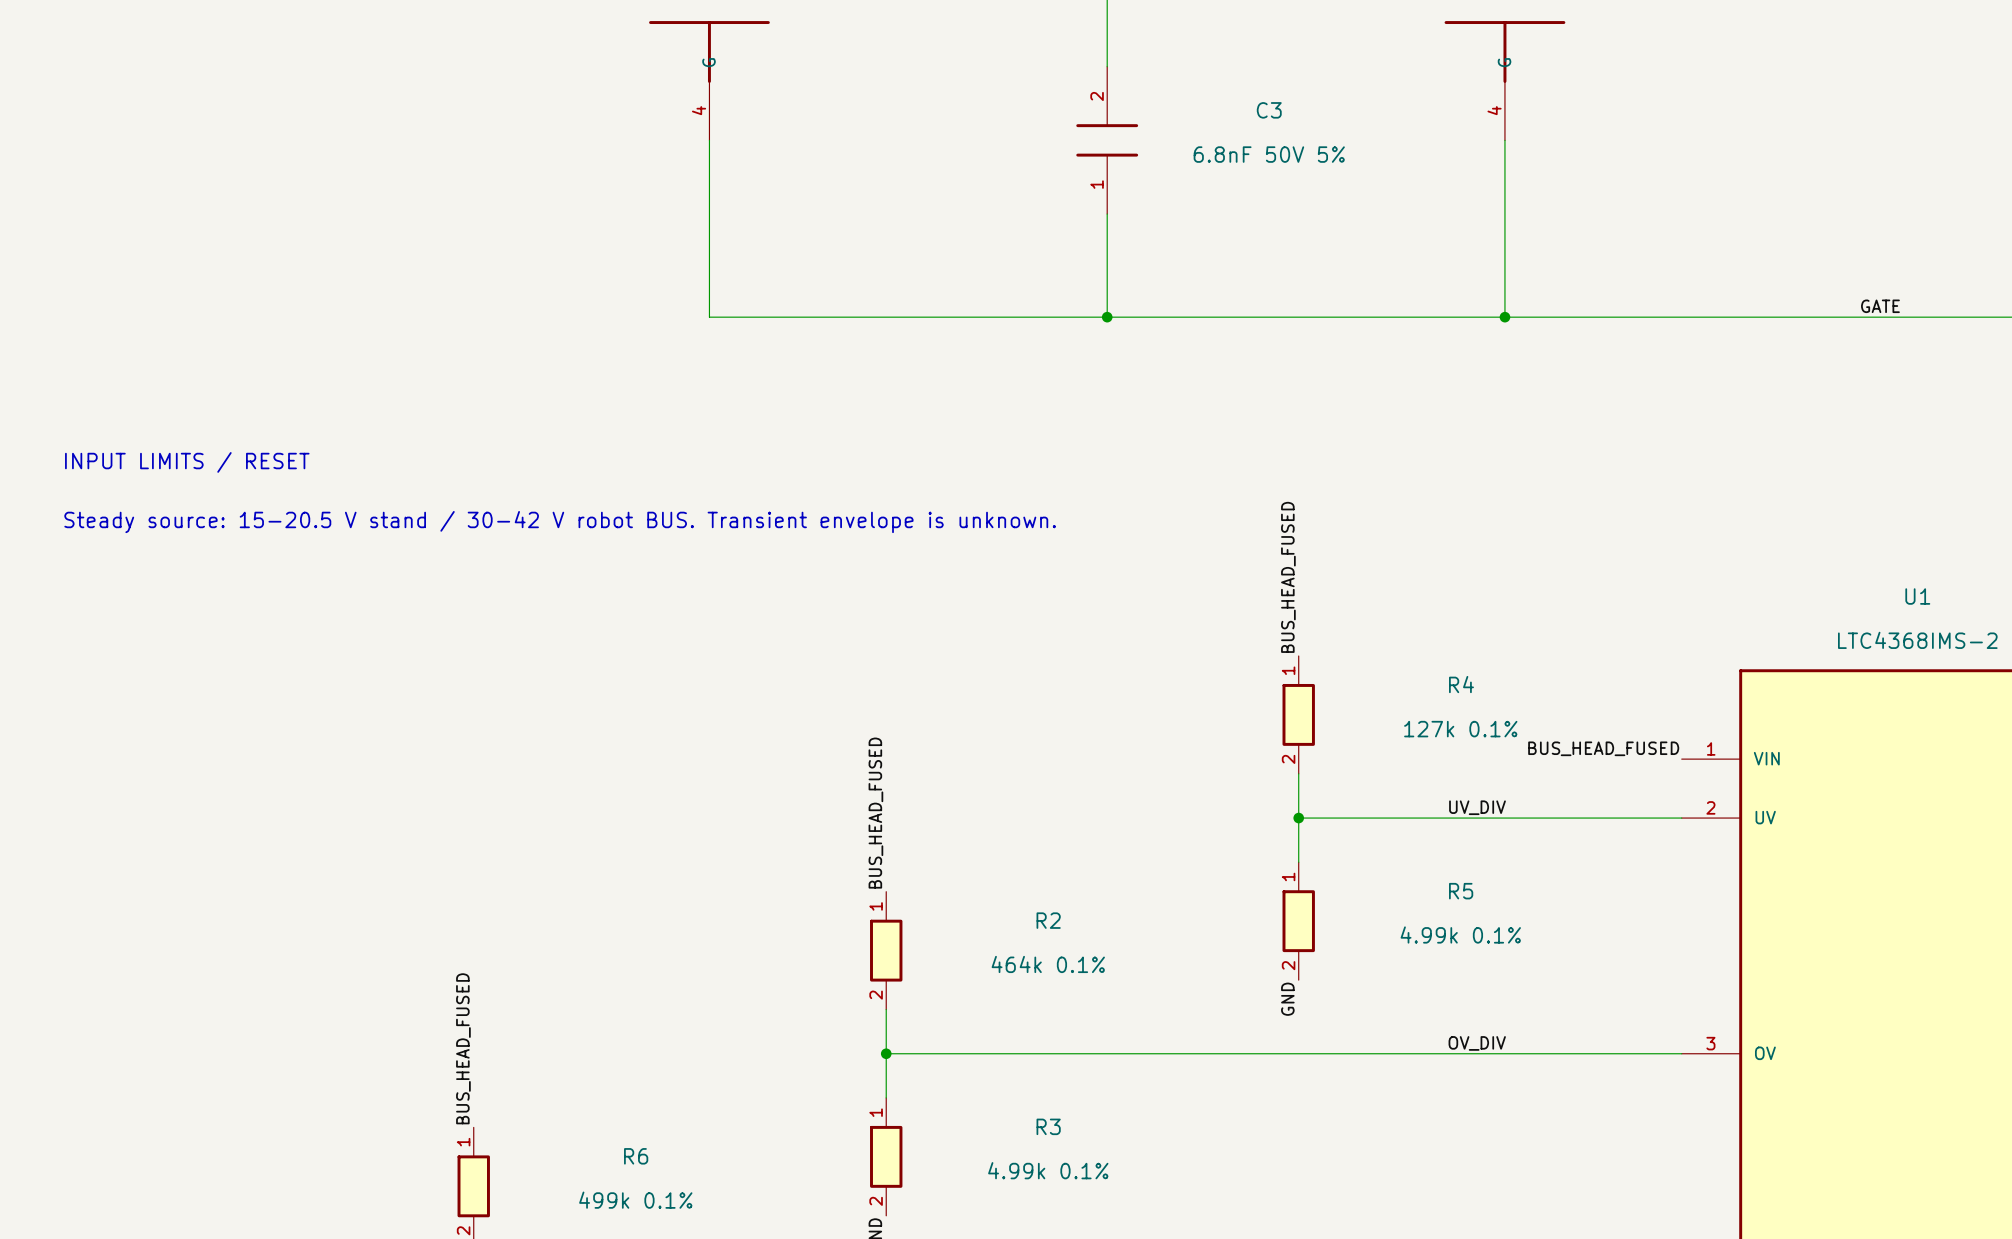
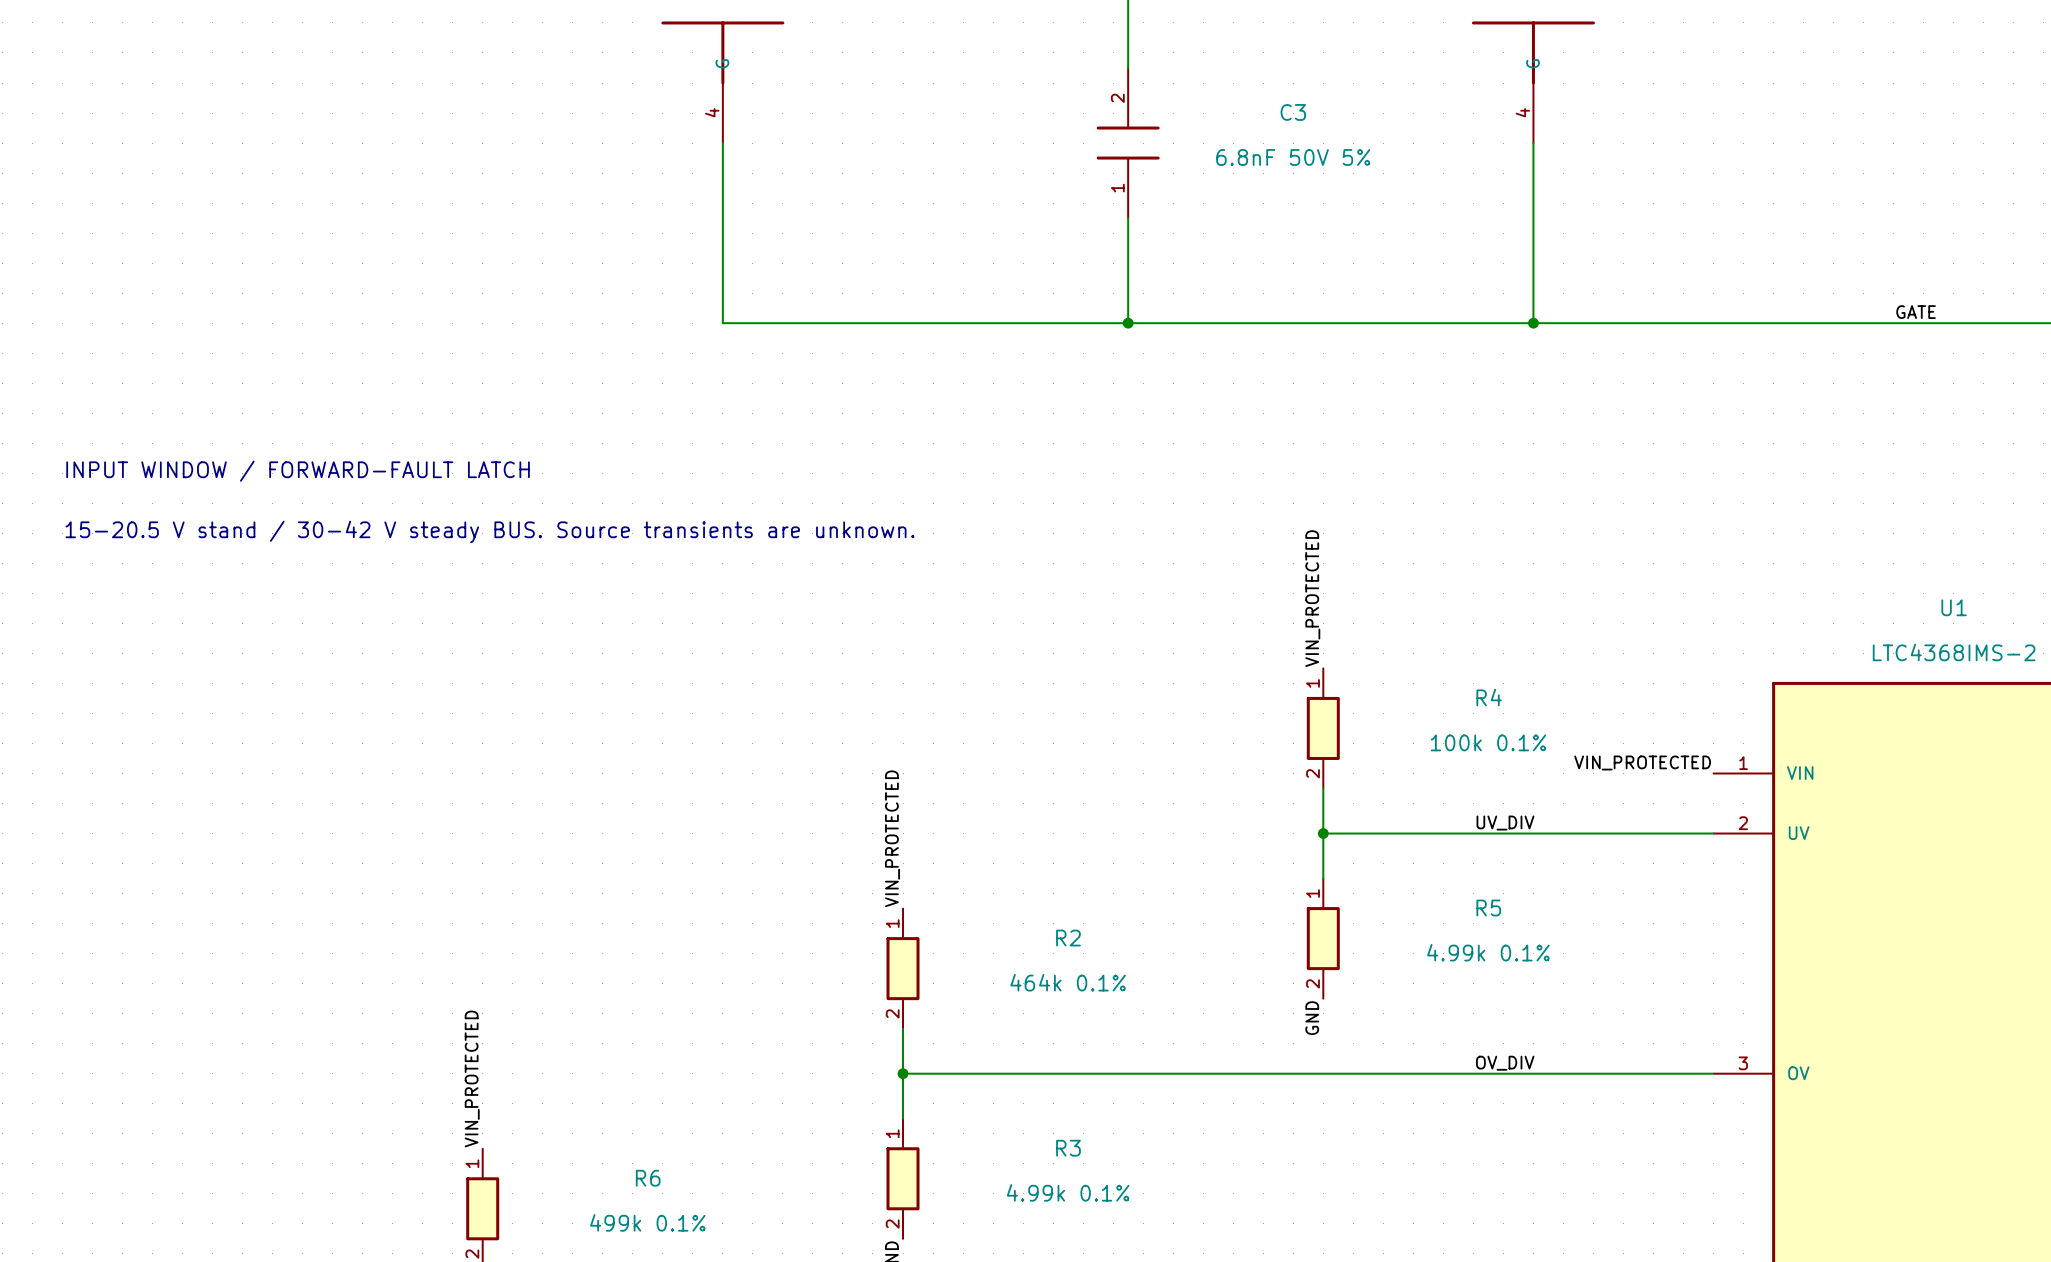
text: INPUT LIMITS / RESET (187, 462) -> INPUT WINDOW / FORWARD-FAULT LATCH (298, 471)
text: Steady source: 15-20.5 V stand / 30-42 V robot BUS. Transient envelope is unknown. (560, 522) -> 15-20.5 V stand / 30-42 V steady BUS. Source transients are unknown. (489, 531)
label: BUS_HEAD_FUSED (1288, 577) -> VIN_PROTECTED (1312, 598)
R4 value: 127k 0.1% (1460, 729) -> 100k 0.1% (1488, 742)
label: BUS_HEAD_FUSED (1603, 748) -> VIN_PROTECTED (1642, 762)
label: BUS_HEAD_FUSED (875, 813) -> VIN_PROTECTED (892, 838)
label: BUS_HEAD_FUSED (463, 1048) -> VIN_PROTECTED (472, 1078)

